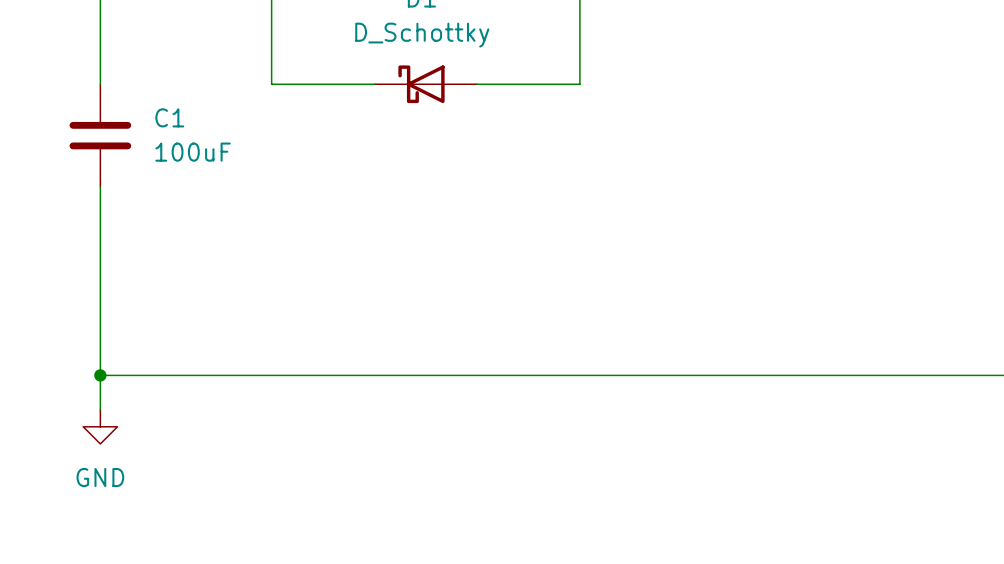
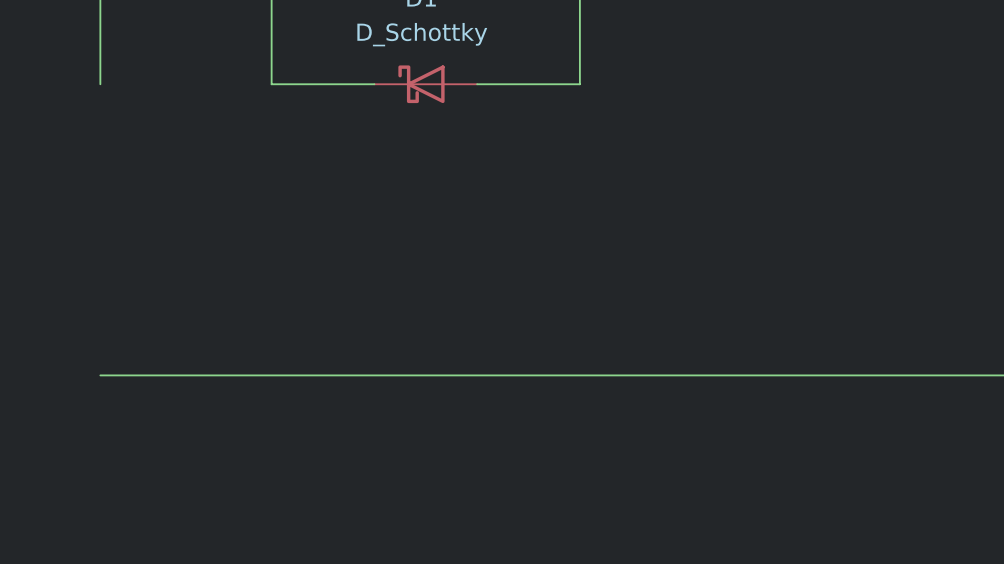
C1: 100uF (100, 135) -> none
wire: (100, 187) (100, 409) -> none
junction: (100, 375) -> none
power symbol: GND (100, 426) -> none

